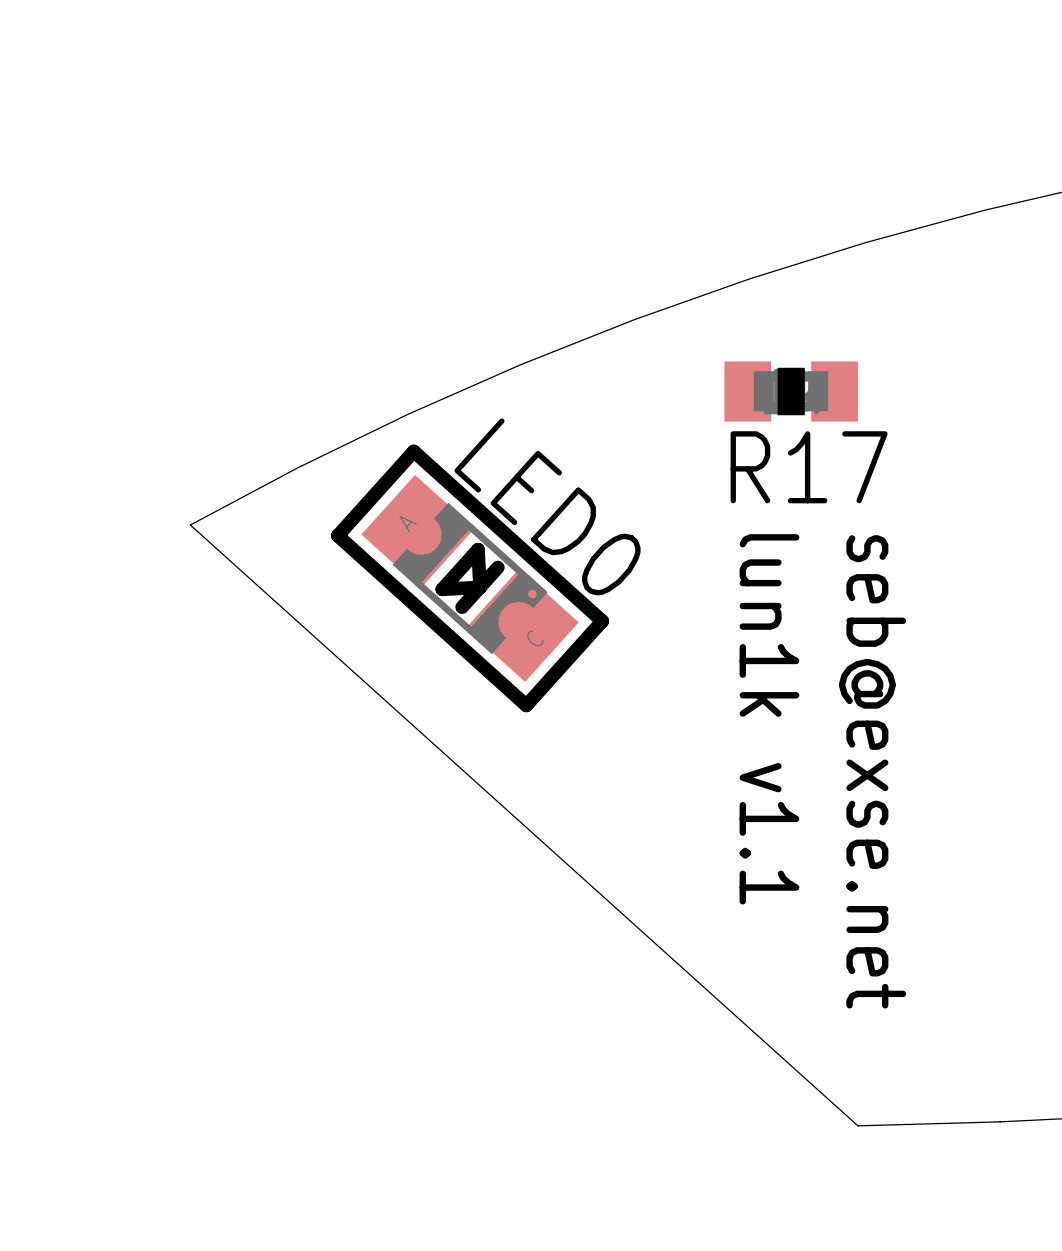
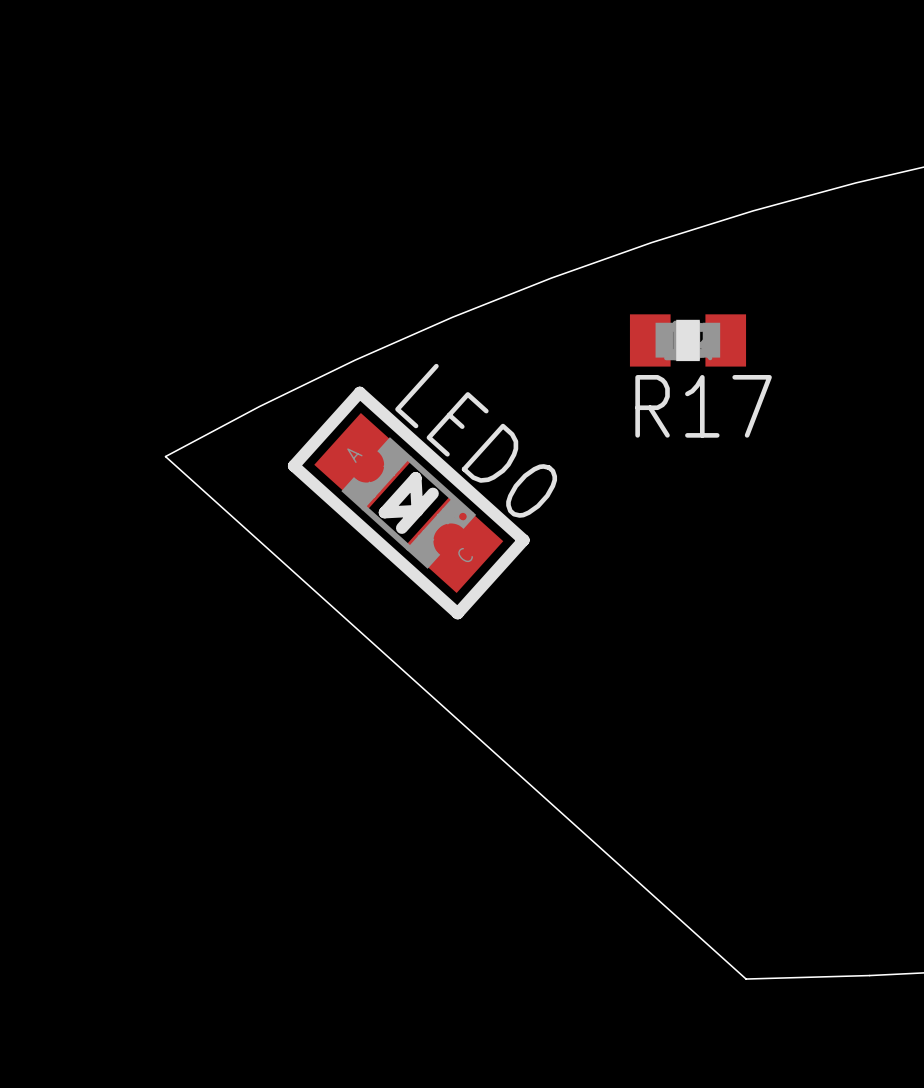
text: lun1k v1.1 (769, 719) -> none
text: seb@exse.net (872, 771) -> none

